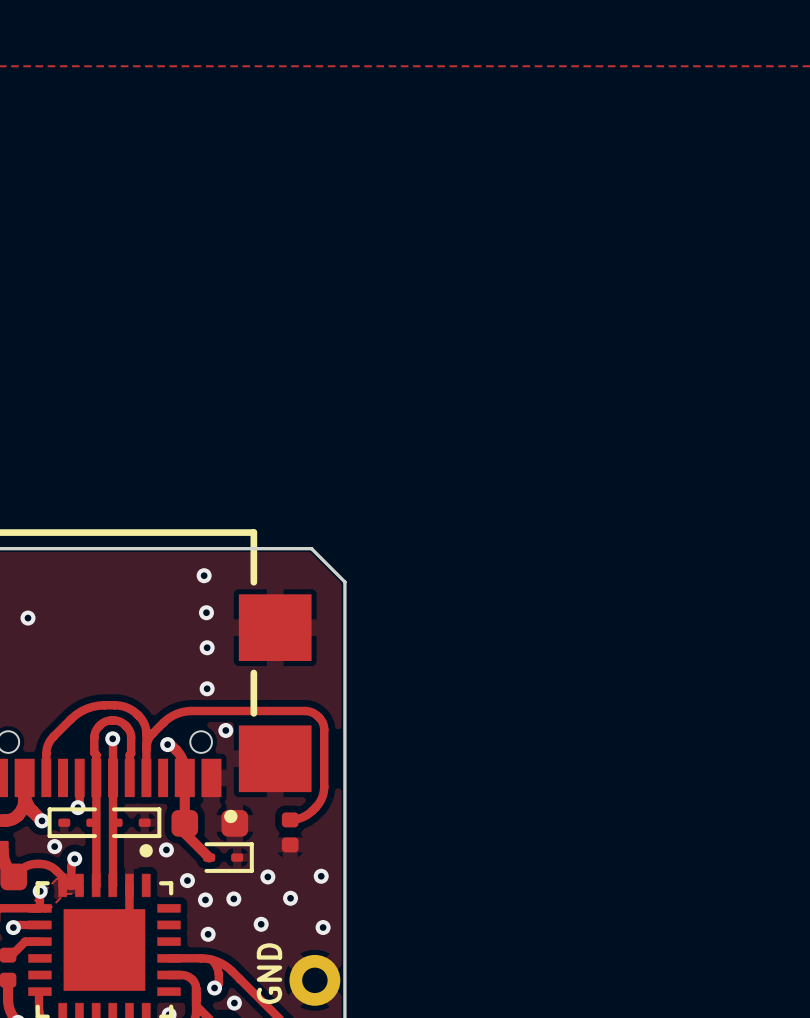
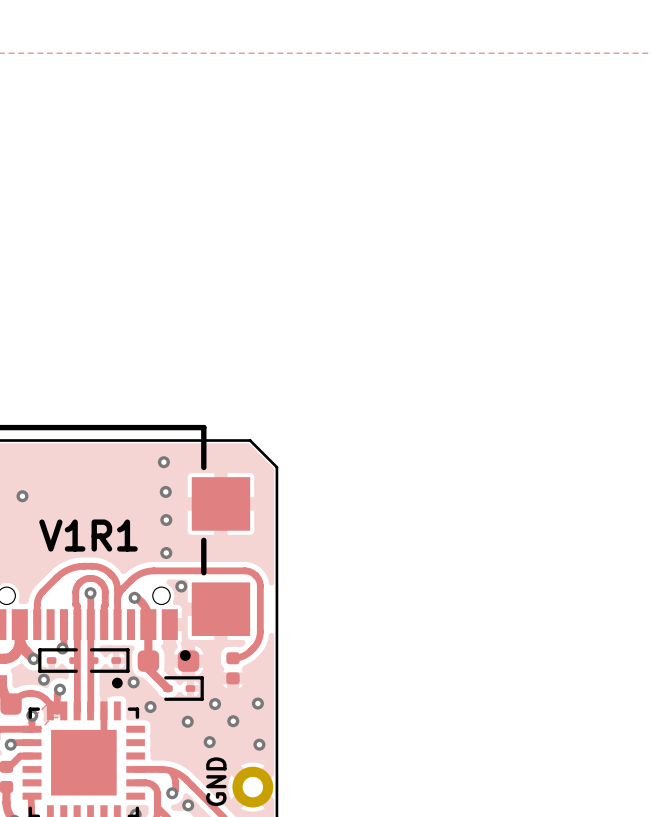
text: none -> V1R1 (88, 535)
via: (205, 899) -> none
via: (208, 934) -> none

